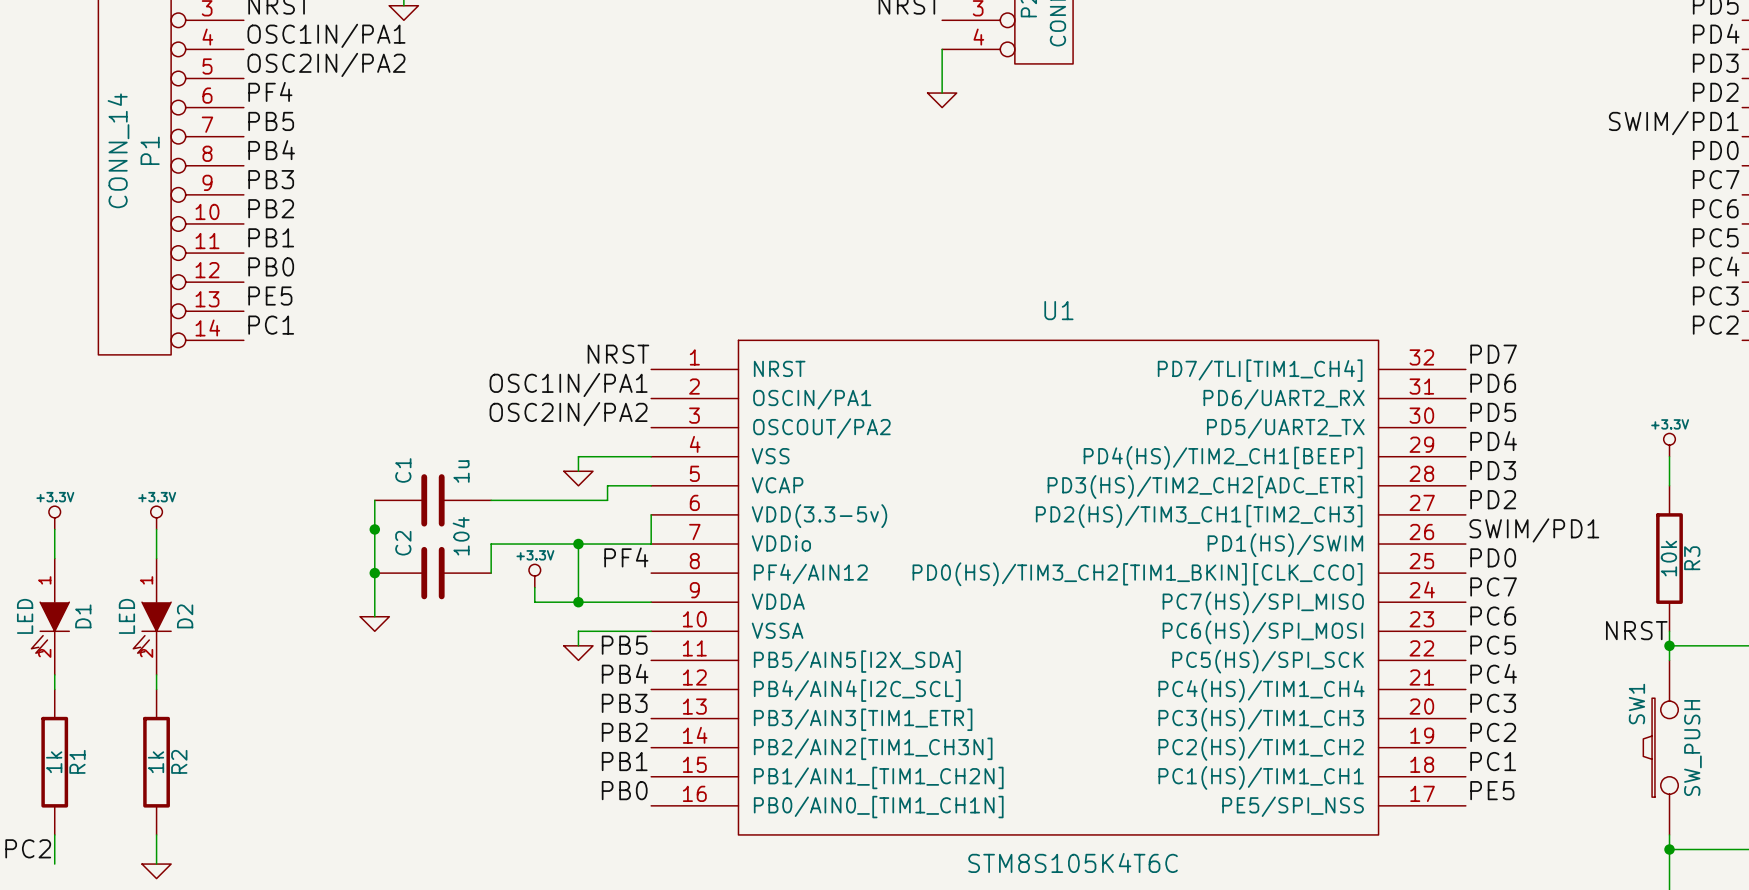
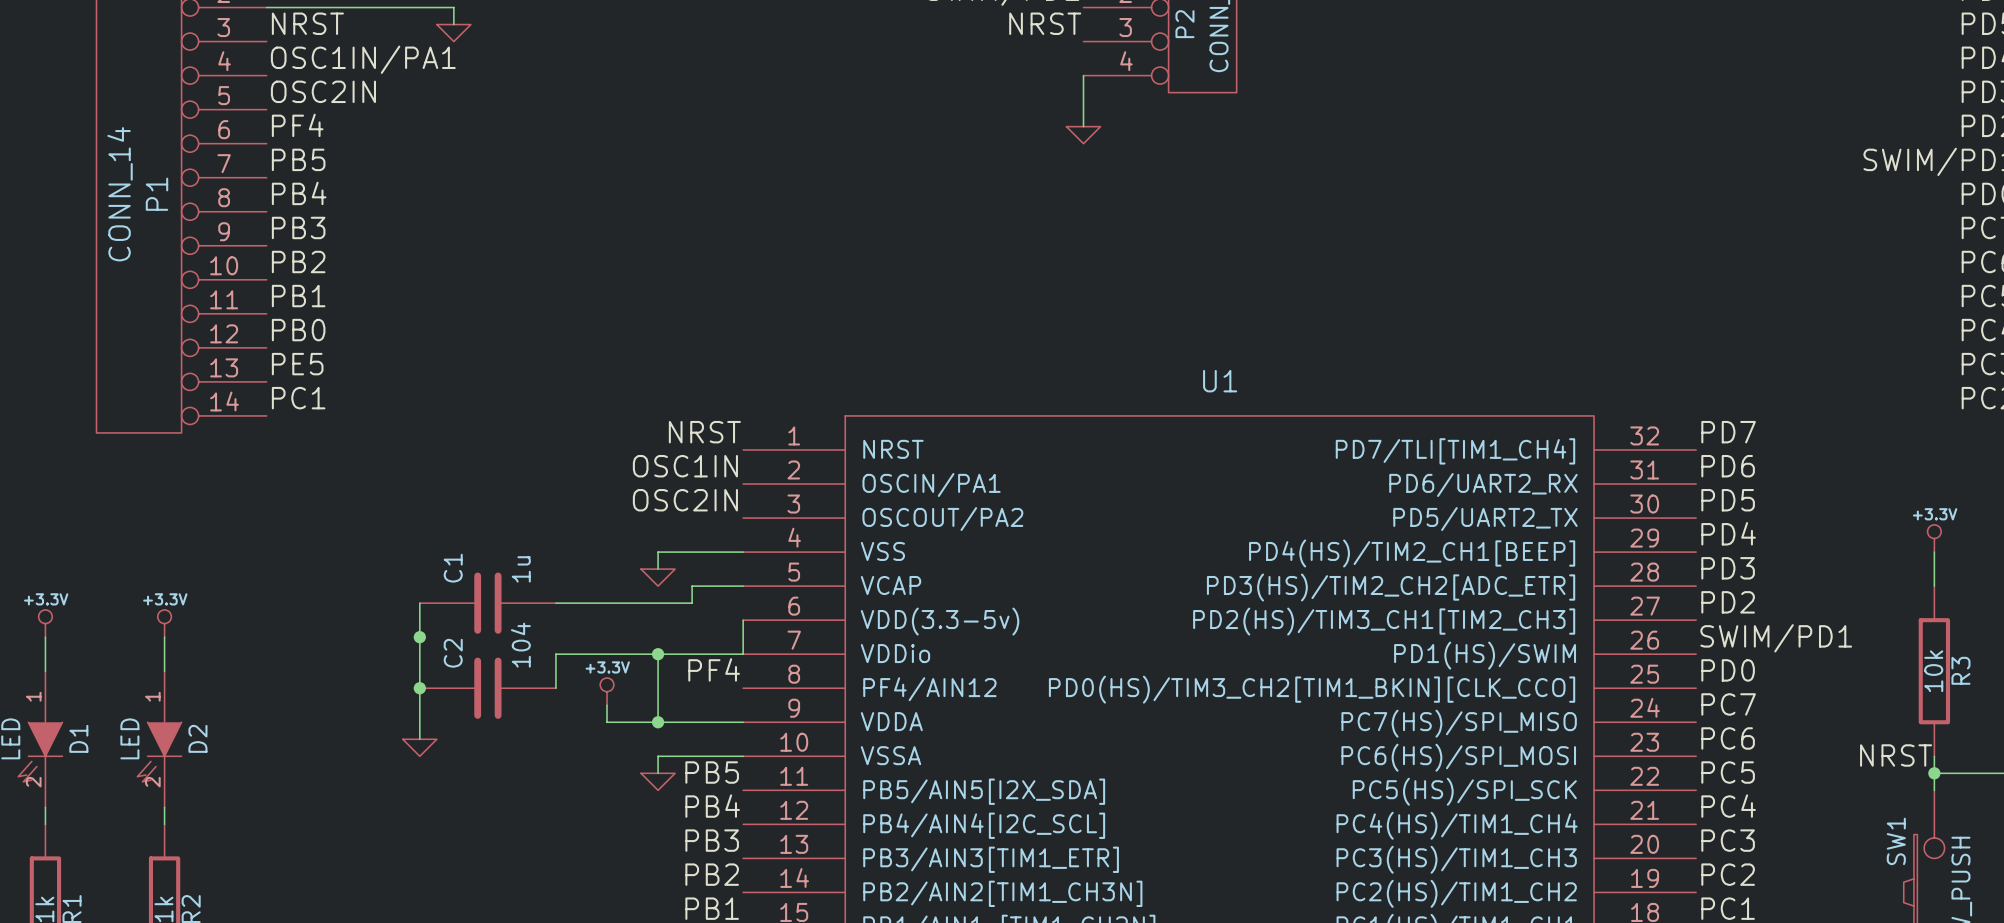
label: OSC2IN/PA2 (326, 64) -> OSC2IN (323, 91)
label: OSC1IN/PA1 (568, 384) -> OSC1IN (685, 466)
label: OSC2IN/PA2 (568, 414) -> OSC2IN (685, 500)

